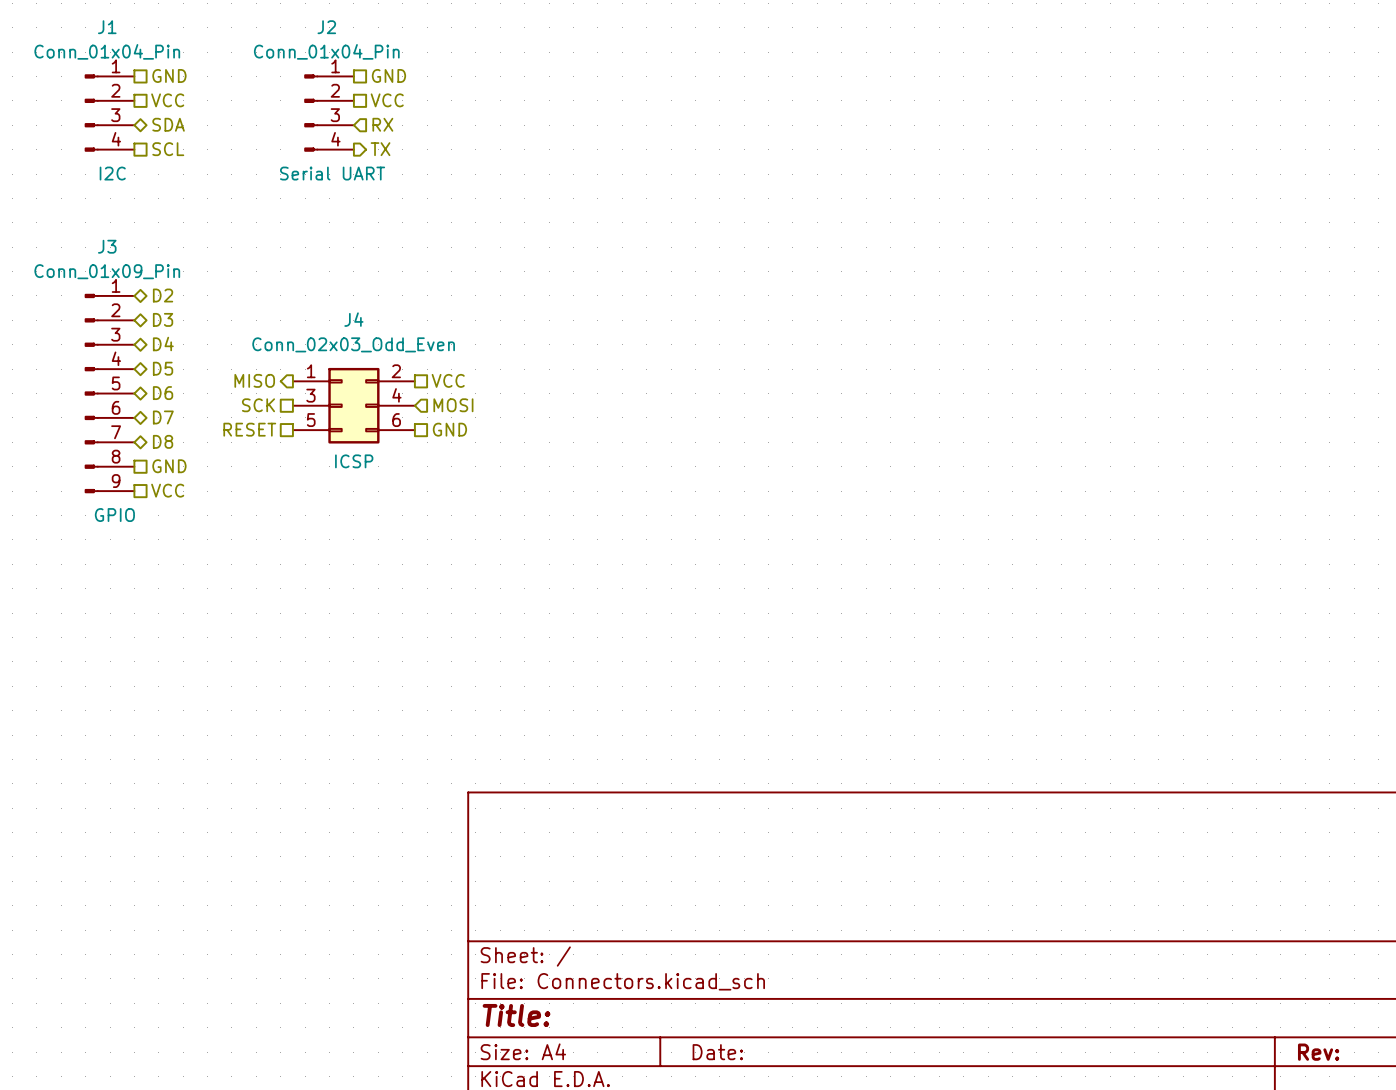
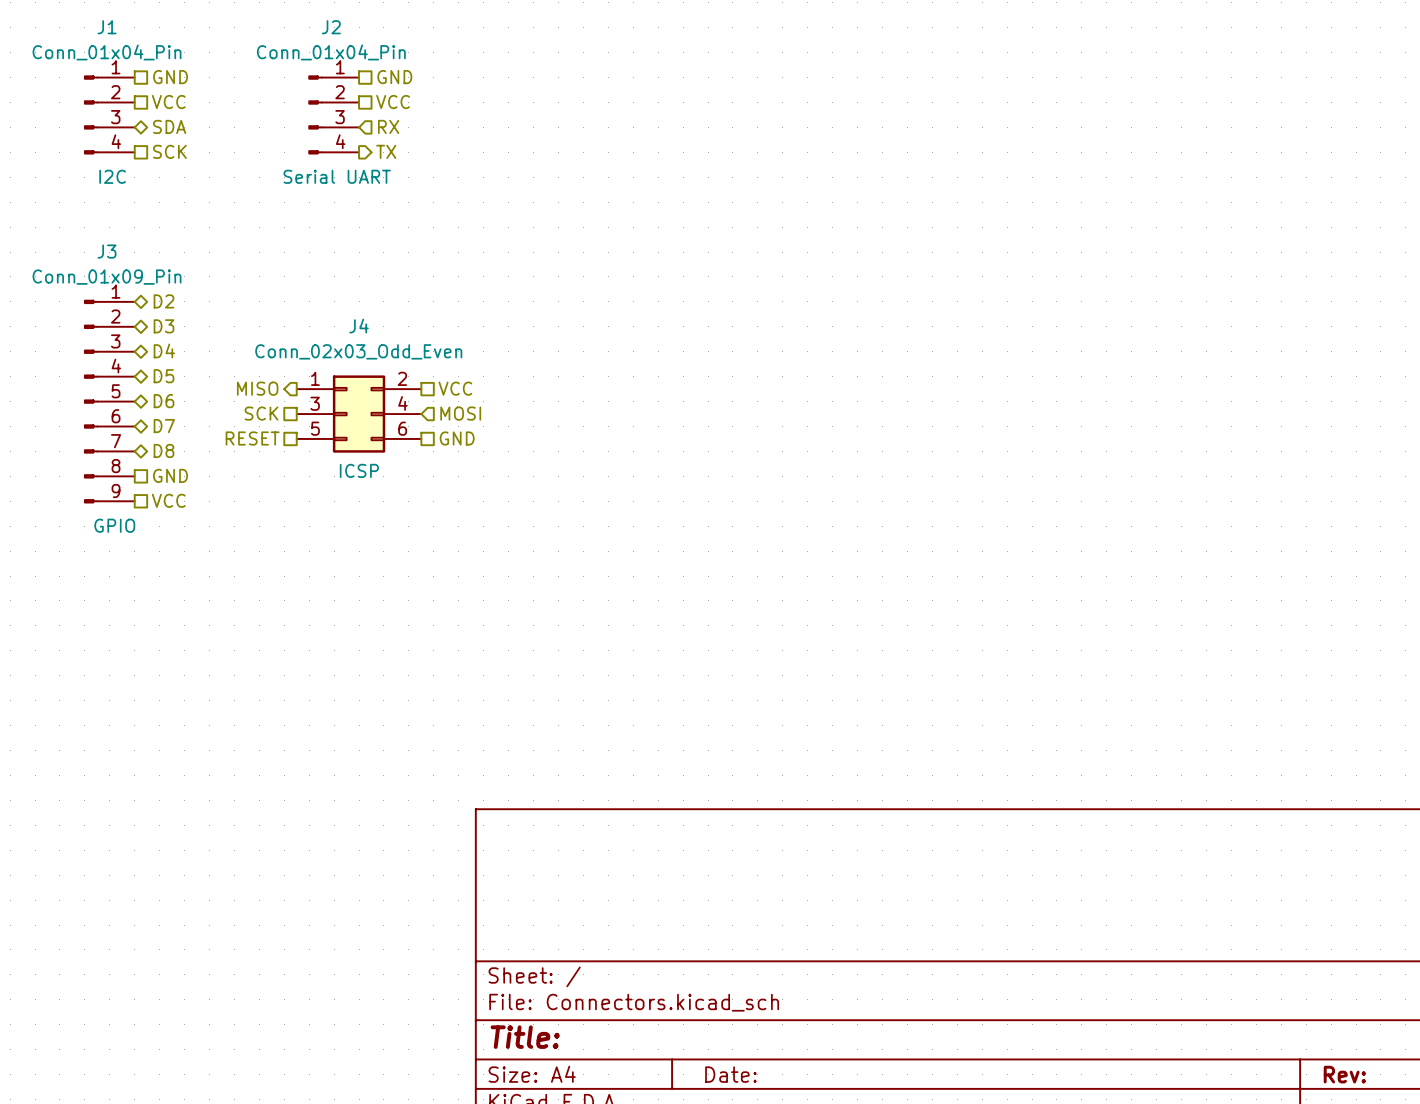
hierarchical label: SCL (168, 149) -> SCK (169, 151)

